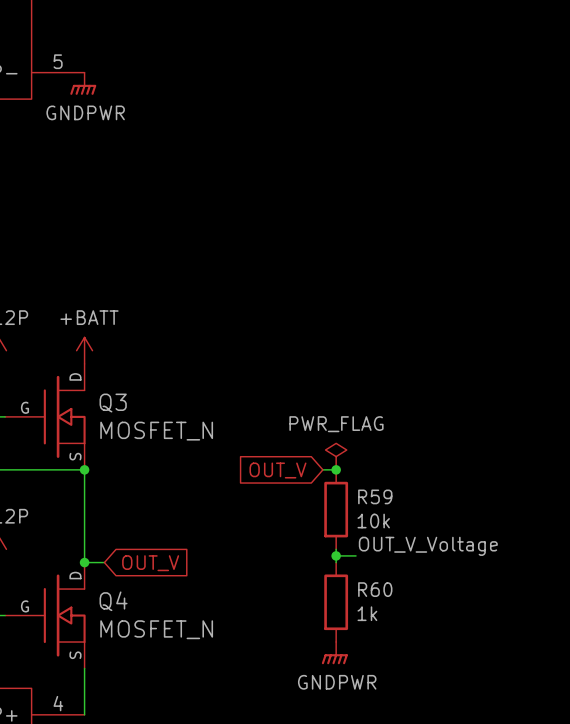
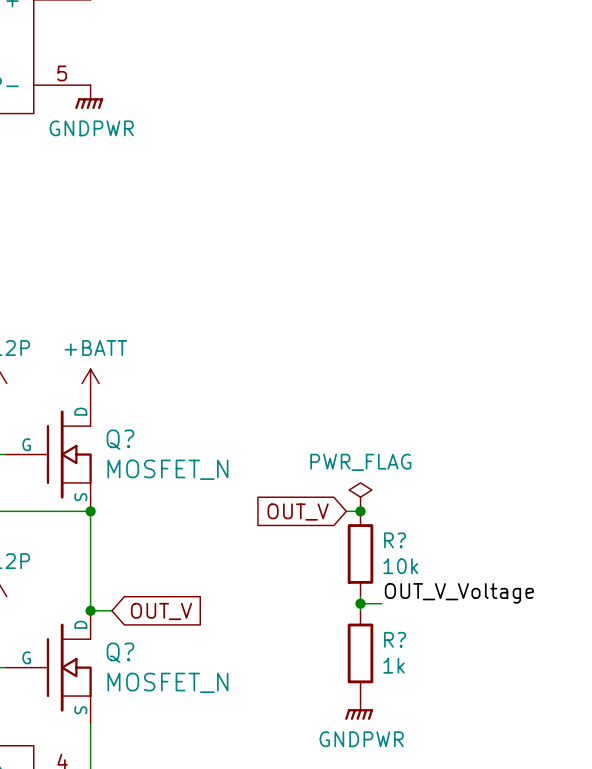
Q3 name: Q3 (113, 403) -> Q? (120, 439)
R59 name: R59 (375, 496) -> R? (395, 540)
R60 name: R60 (375, 589) -> R? (395, 639)
Q4 name: Q4 (113, 601) -> Q? (120, 652)

